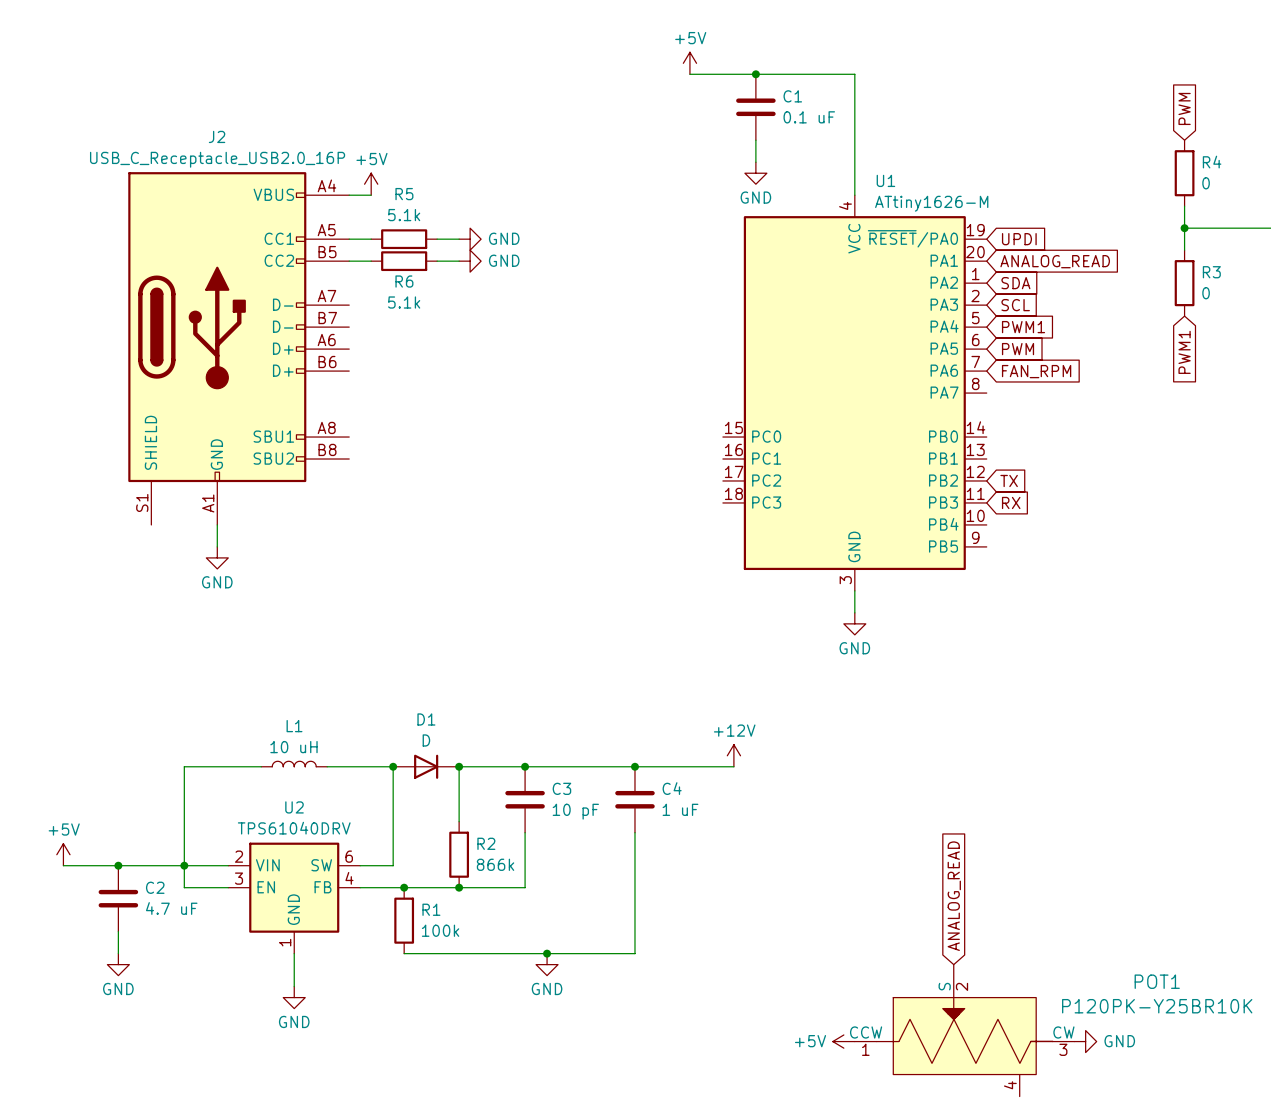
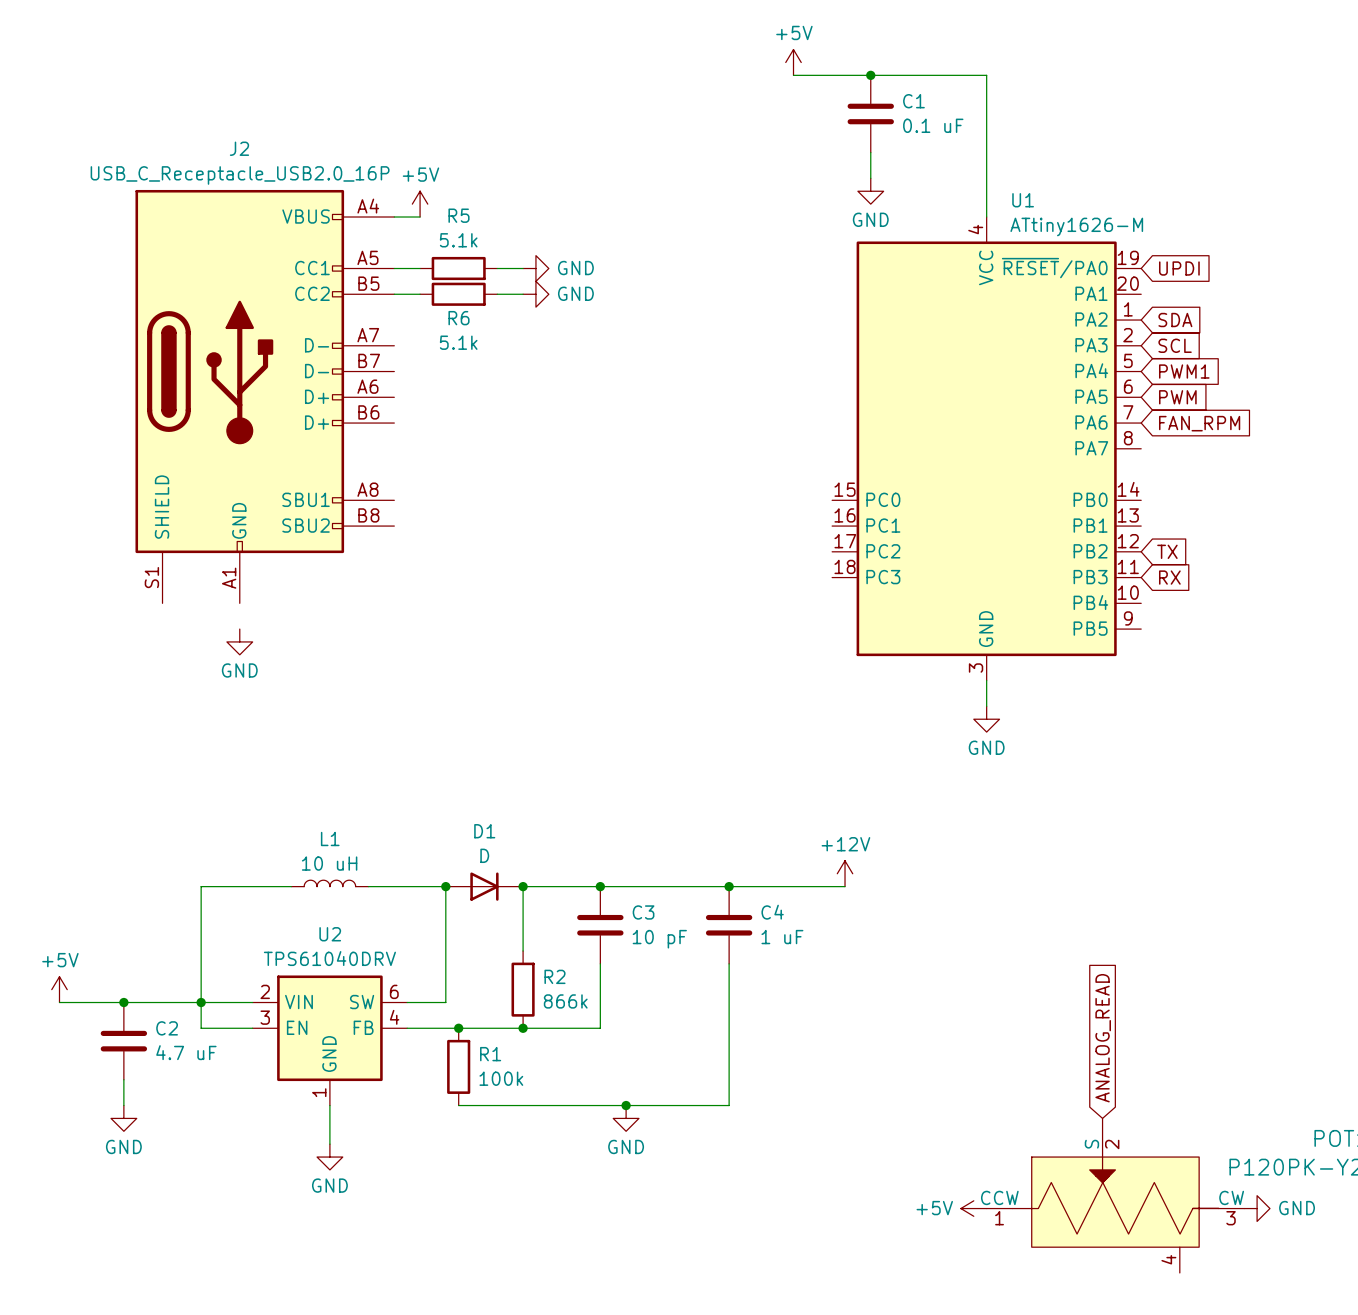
global label: ANALOG_READ (1055, 261) -> none
wire: (217, 524) (217, 546) -> none

